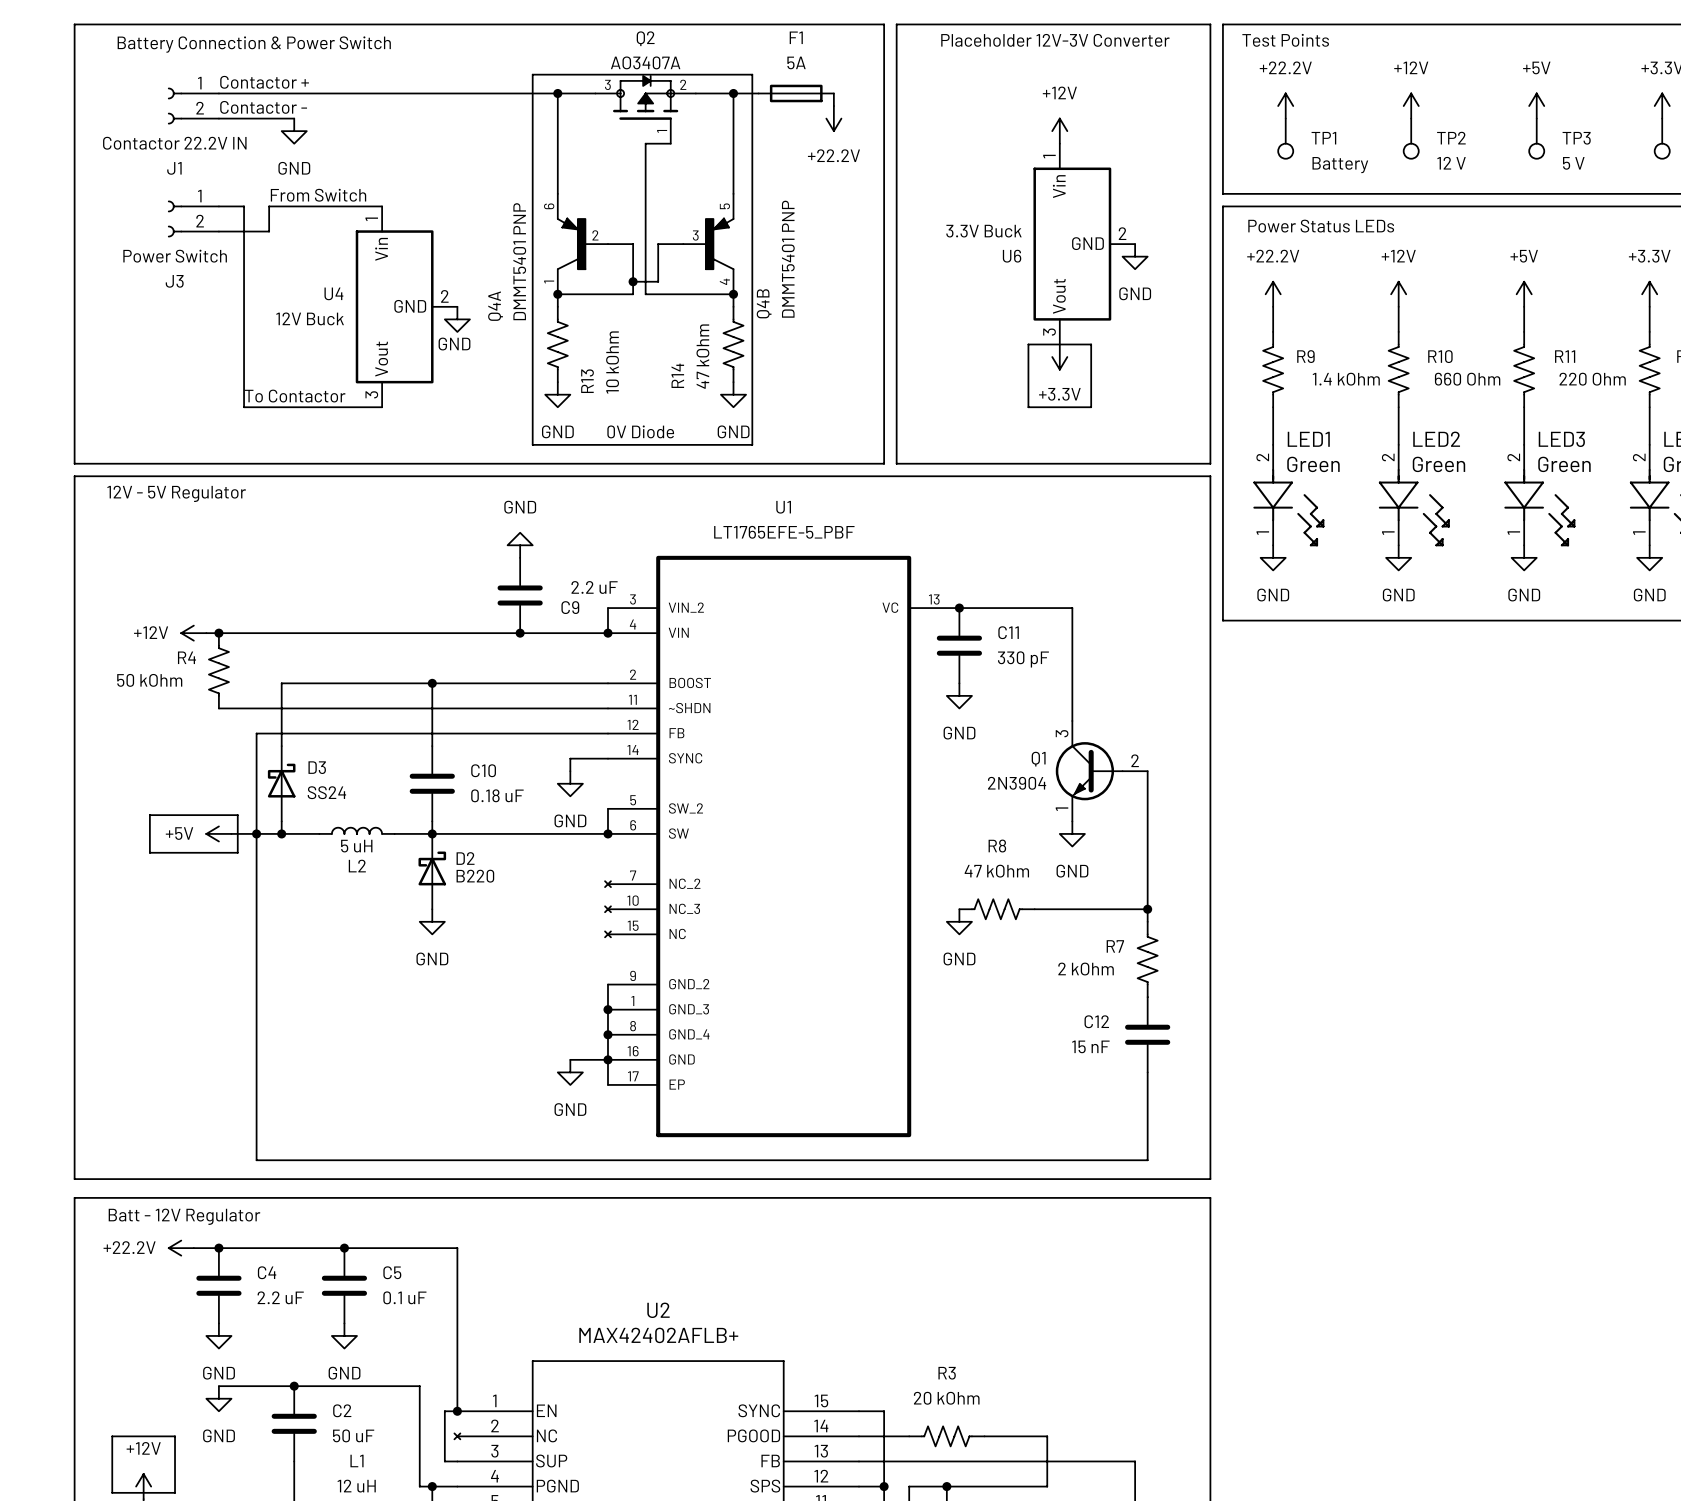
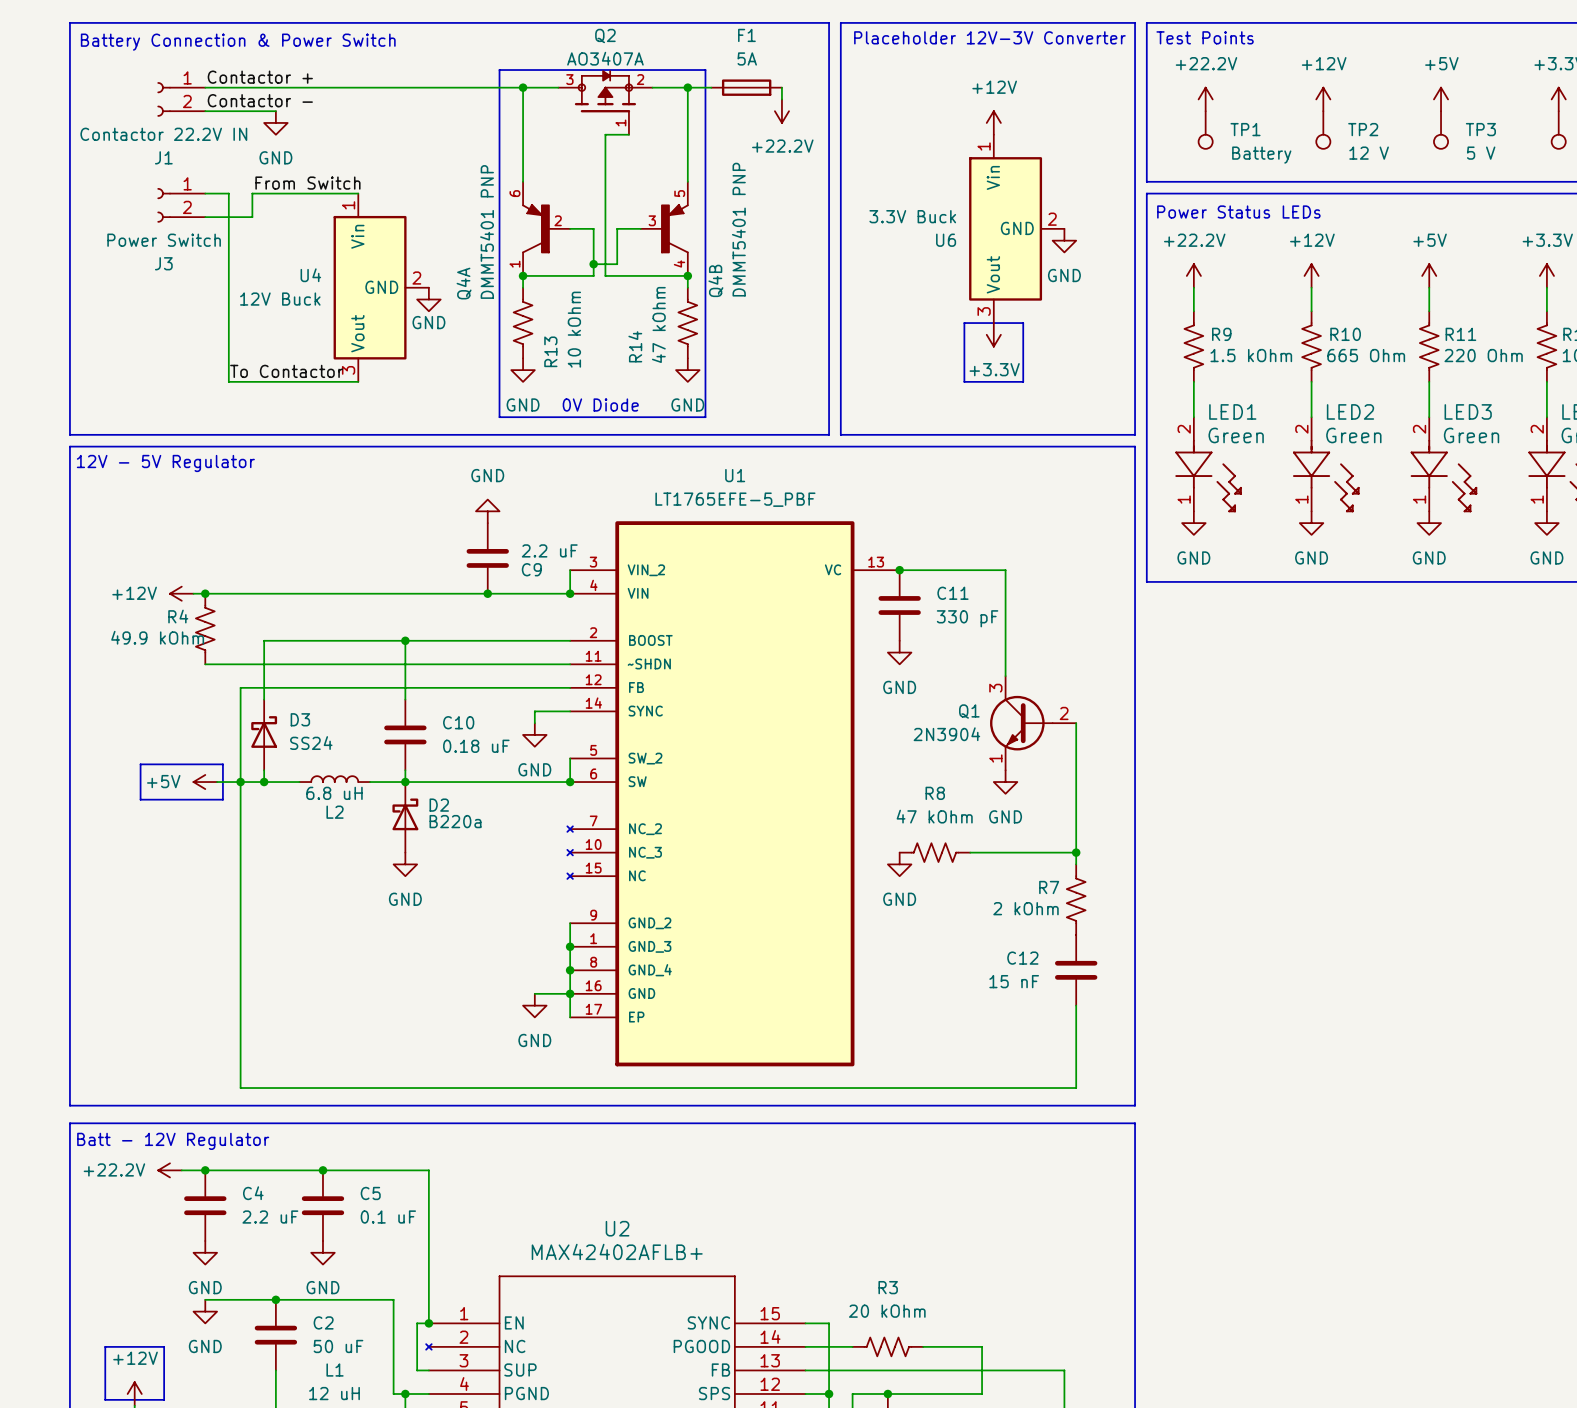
R9 value: 1.4 kOhm (1346, 379) -> 1.5 kOhm (1251, 355)
R10 value: 660 Ohm (1467, 379) -> 665 Ohm (1366, 355)
R4 value: 50 kOhm (149, 680) -> 49.9 kOhm (157, 637)
L2 value: 5 uH (356, 846) -> 6.8 uH (334, 793)
D2 value: B220 (475, 876) -> B220a (455, 821)

